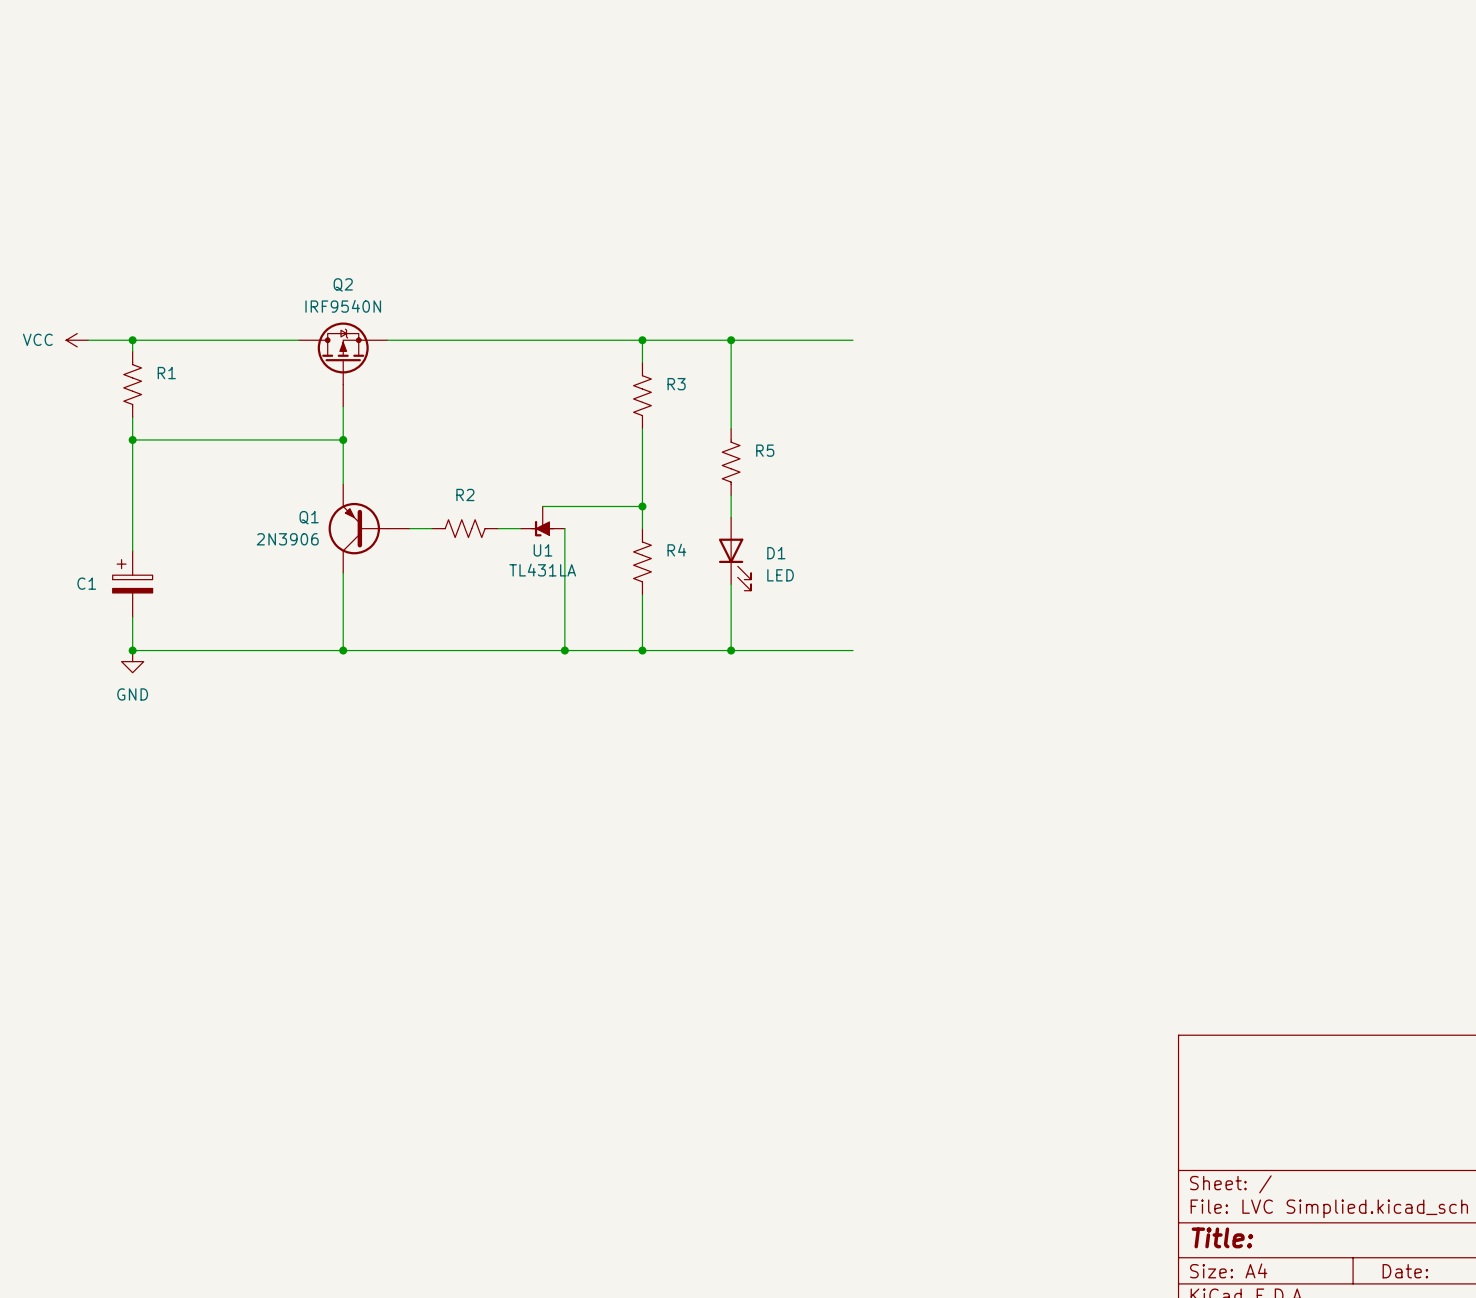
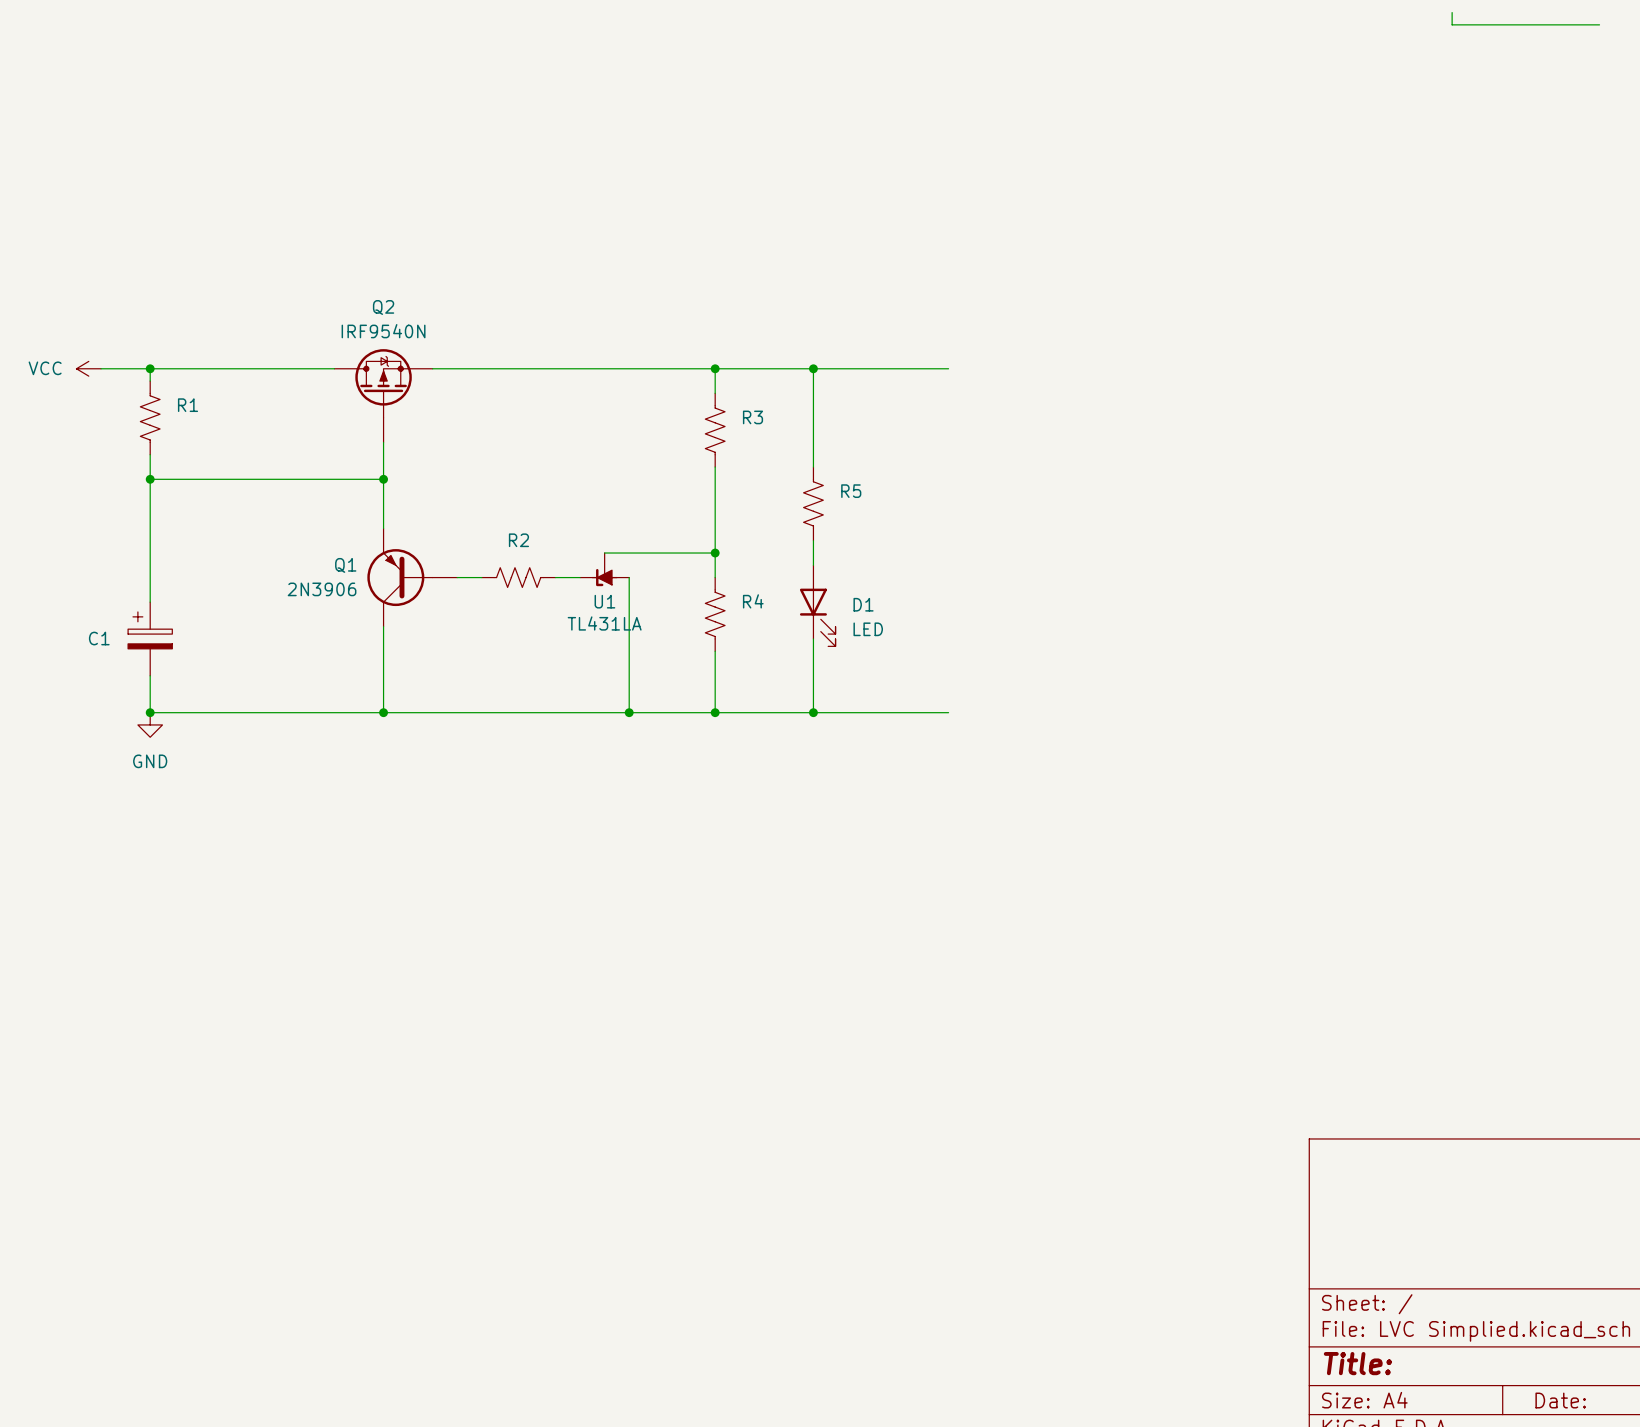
wire: none -> (1452, 12) (1452, 24) (1599, 24)

